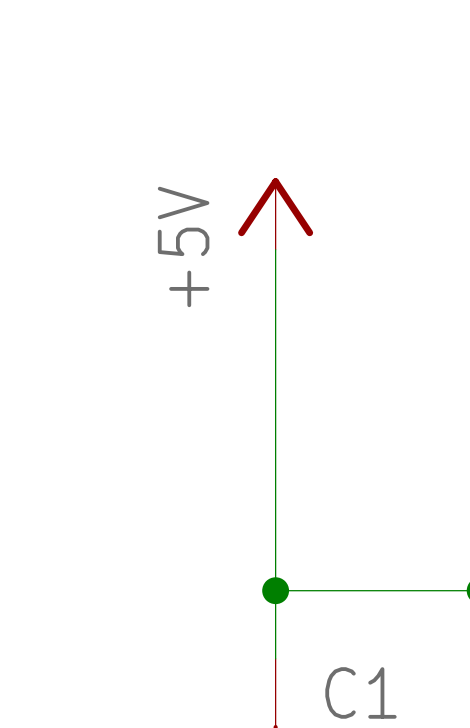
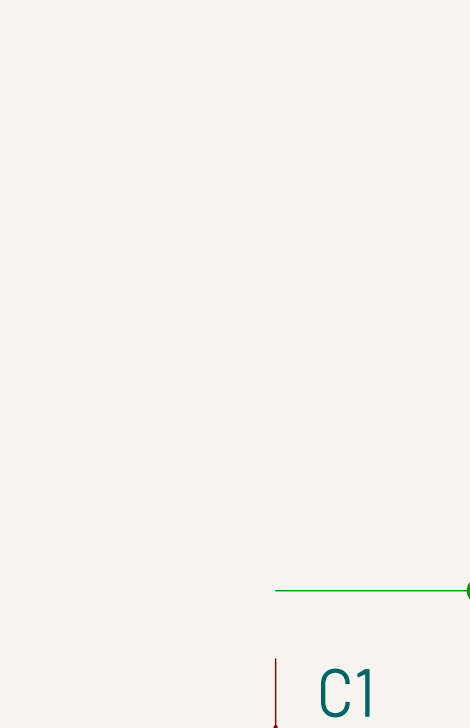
power symbol: +5V (275, 214) -> none
wire: (275, 249) (275, 658) -> none
junction: (275, 590) -> none

